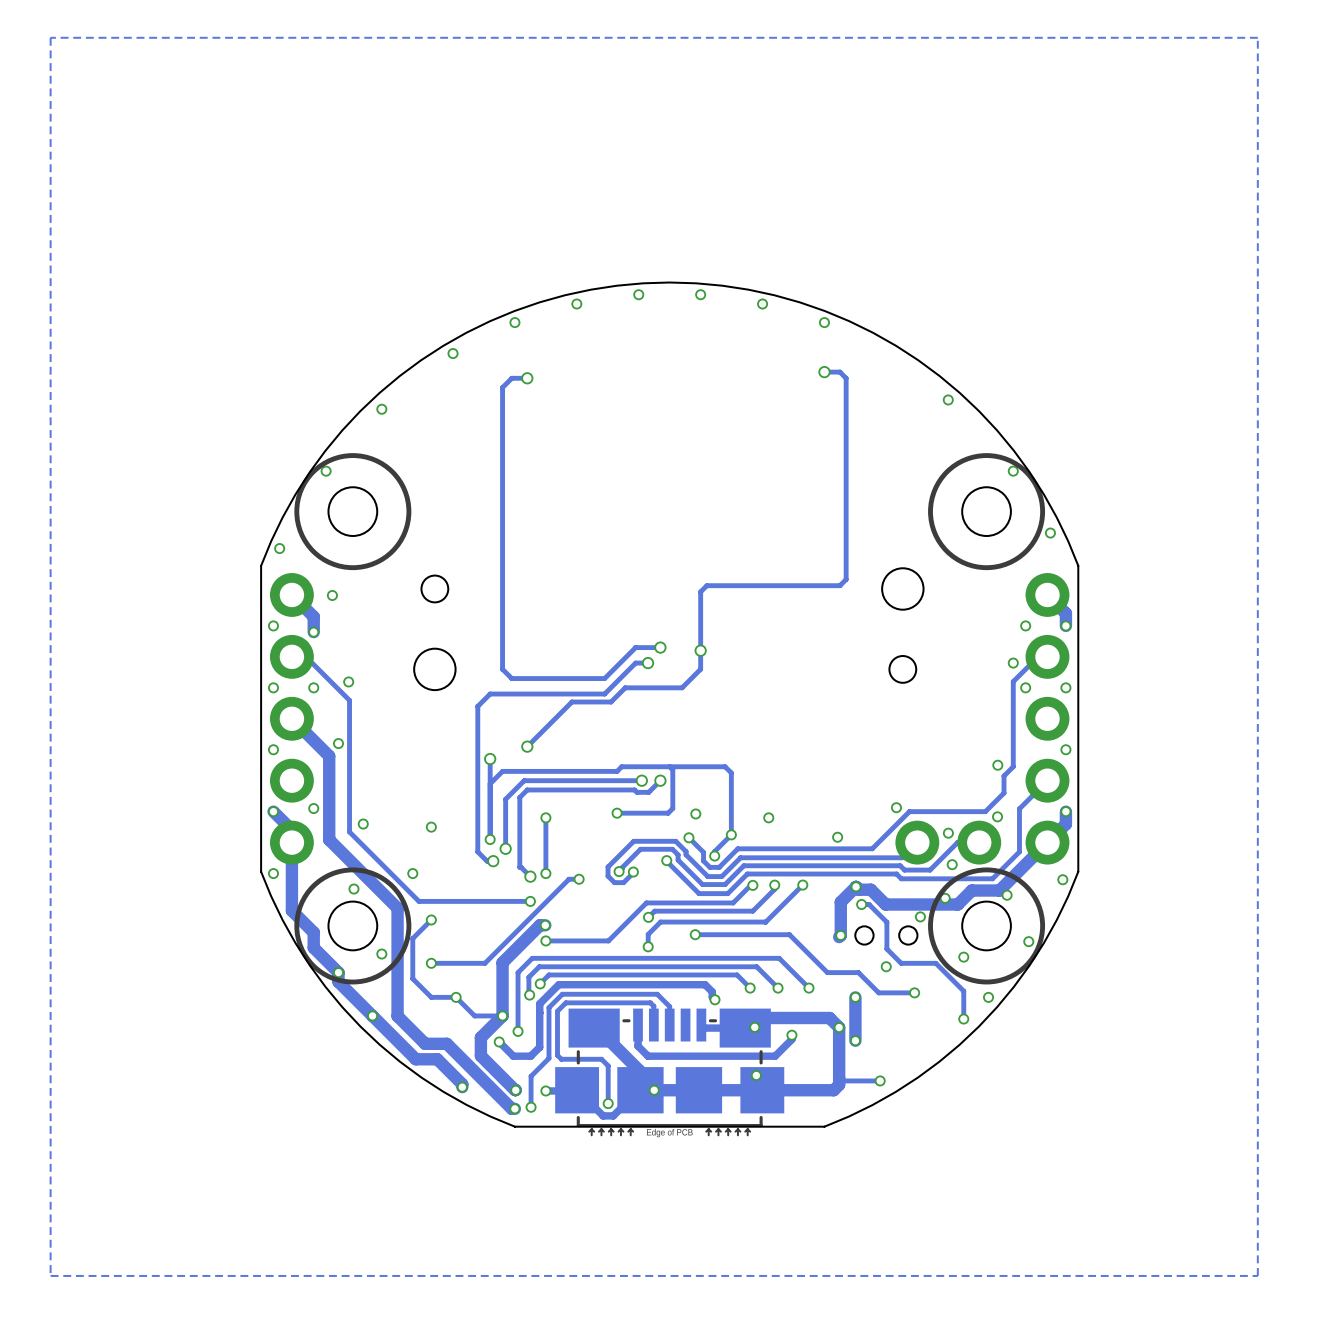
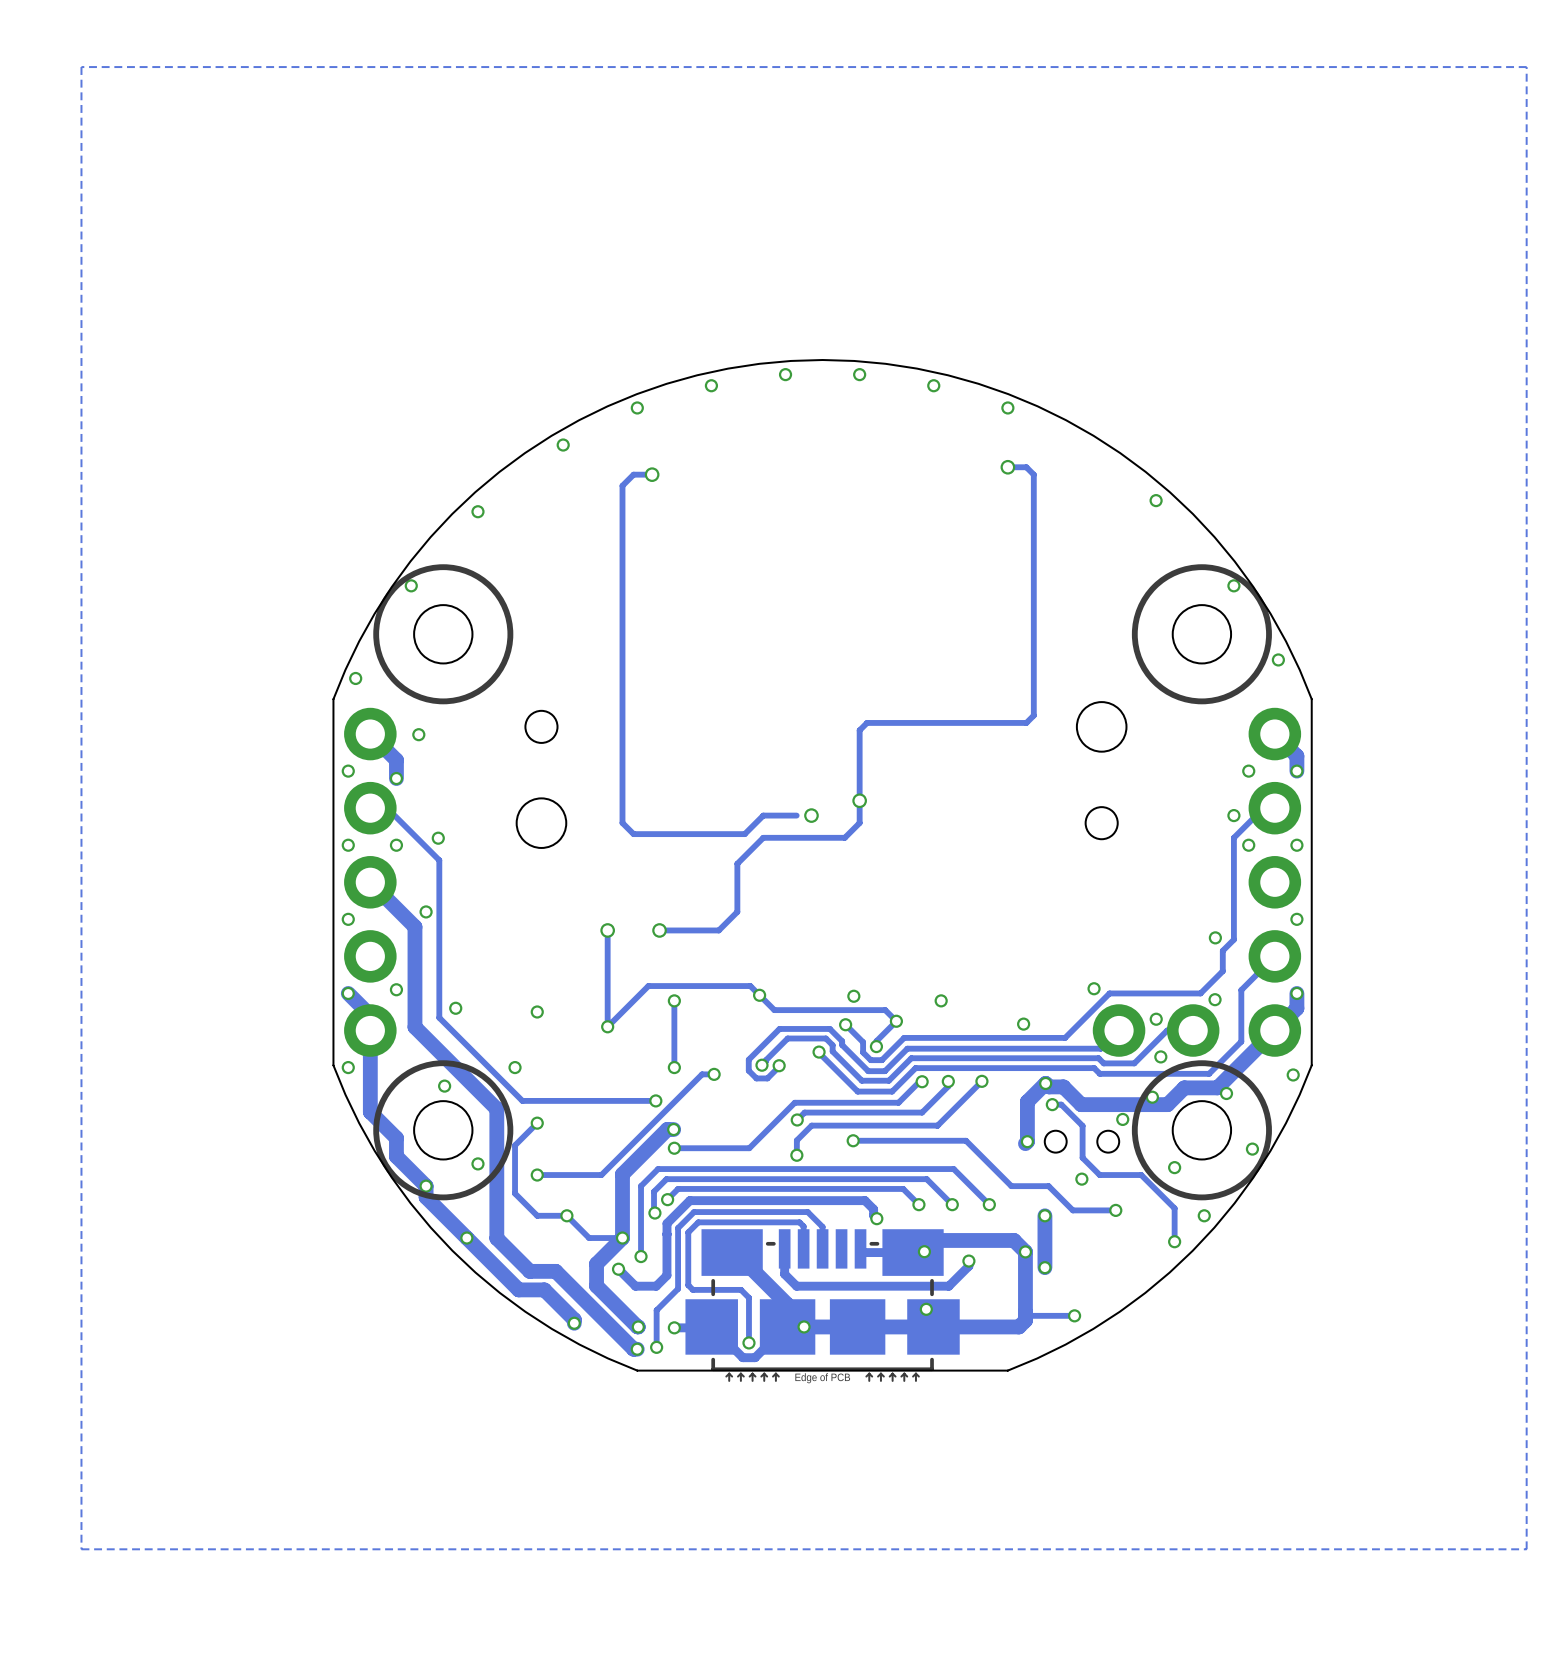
track: (660, 647) (635, 647) (620, 663) -> (781, 815) (763, 815)
via: (660, 647) -> none
track: (635, 663) (604, 694) (490, 694) (477, 706) (477, 851) (487, 861) (493, 861) -> none
via: (648, 663) -> none
via: none -> (811, 815)
track: (688, 681) (682, 687) (625, 687) (611, 701) (571, 701) (527, 746) -> (844, 837) (763, 837) (737, 863) (737, 911) (718, 930) (659, 930)
via position: (527, 746) -> (659, 930)
track: (669, 766) (672, 769) (672, 808) (668, 813) (617, 813) -> none
track: (641, 780) (524, 780) (505, 799) (505, 848) -> none
via: (641, 780) -> none
track: (660, 780) (648, 792) (637, 792) (634, 789) (527, 789) (519, 797) (519, 867) (530, 876) -> none
via: (660, 780) -> none
track: (490, 783) (502, 771) (617, 771) (621, 766) (725, 766) (731, 772) (731, 834) -> (607, 1026) (648, 986) (750, 986) (774, 1010) (885, 1010) (896, 1021)
via: (505, 848) -> none
via: (493, 861) -> none
via: (530, 876) -> none

